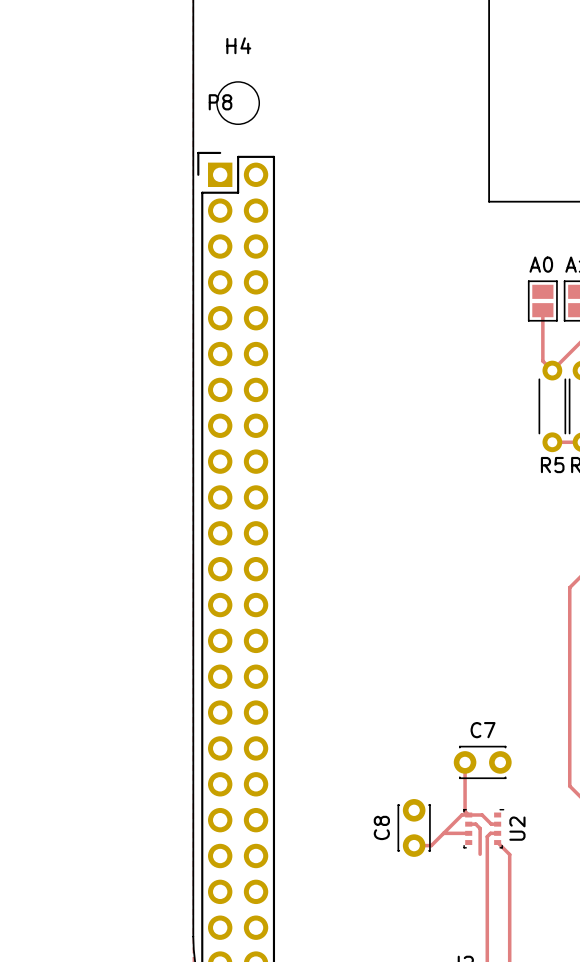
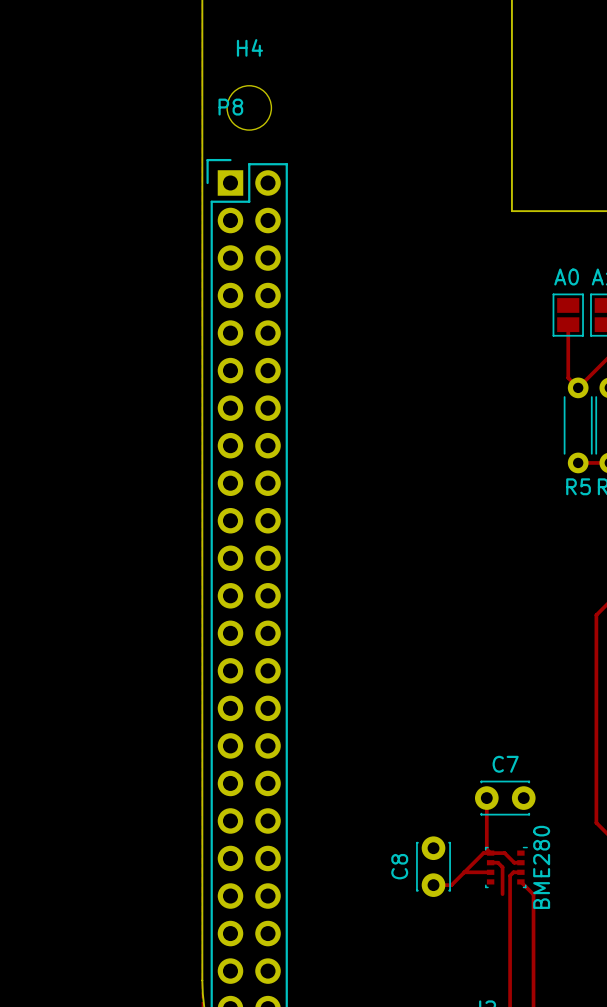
U2 name: U2 (517, 828) -> BME280 (541, 867)

